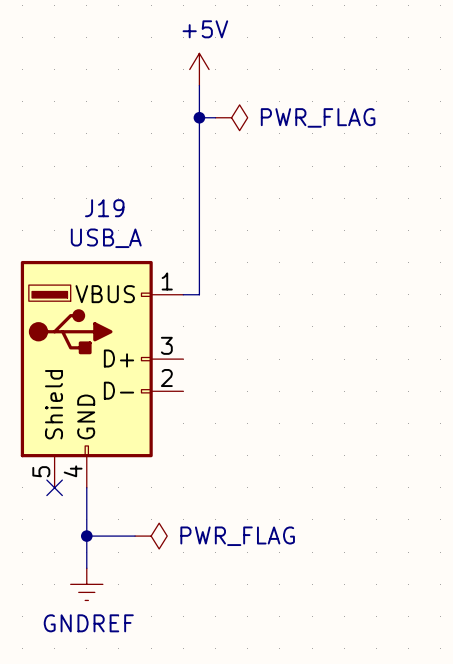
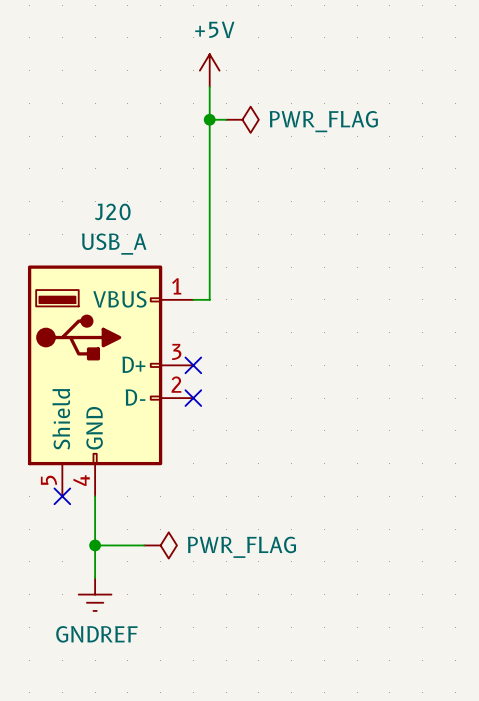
J19 name: J19 (104, 208) -> J20 (112, 211)
no-connect mark: none -> (193, 365)
no-connect mark: none -> (193, 398)

